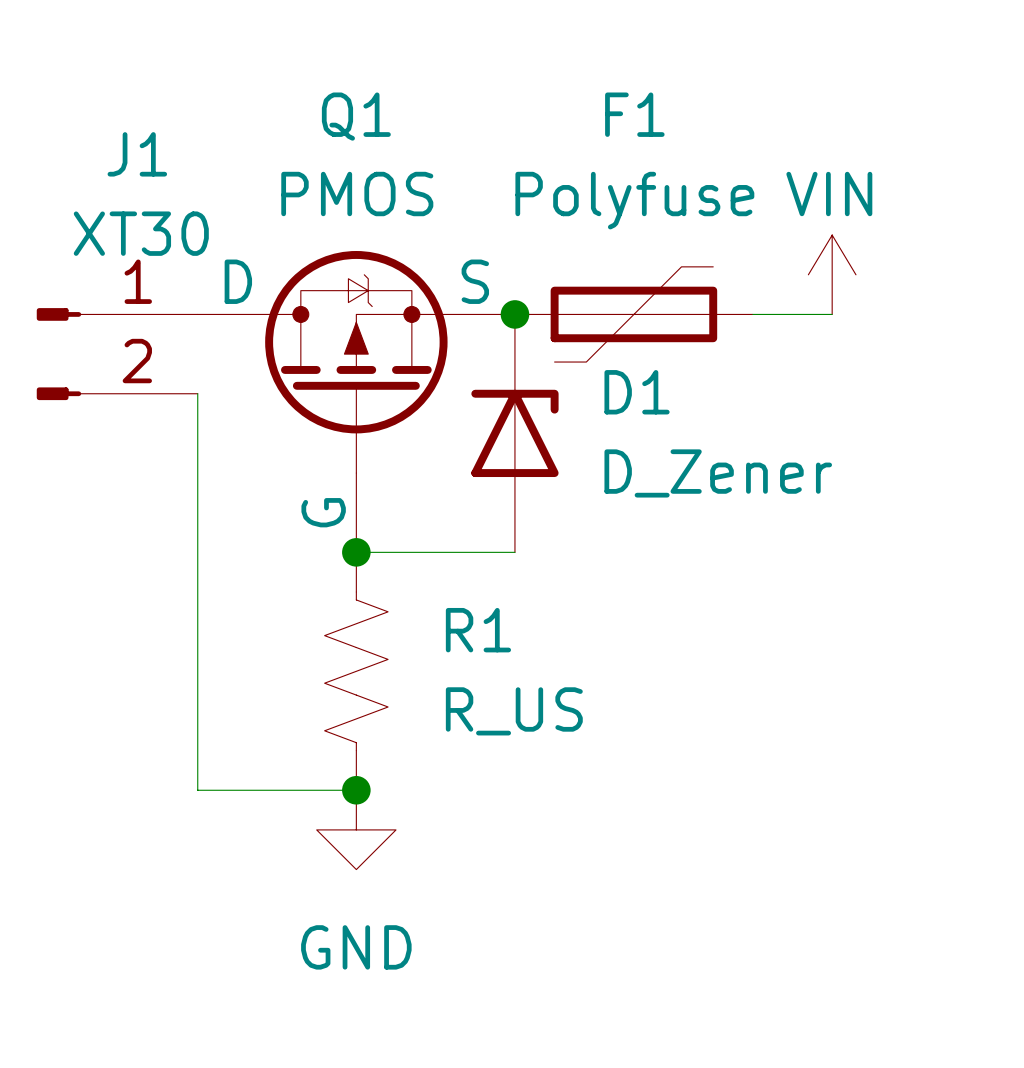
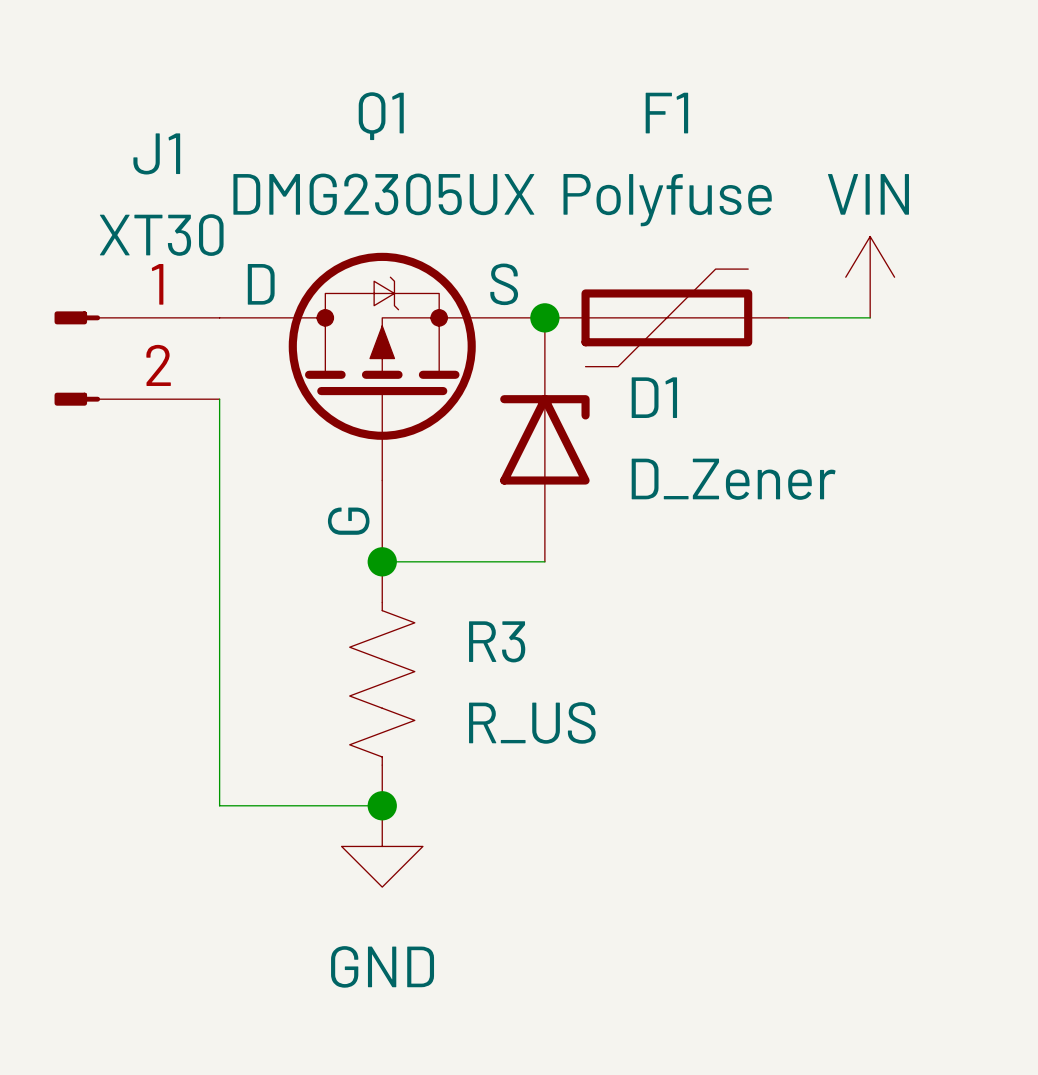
Q1 value: PMOS (357, 194) -> DMG2305UX (383, 194)
R1 name: R1 (478, 630) -> R3 (497, 641)

